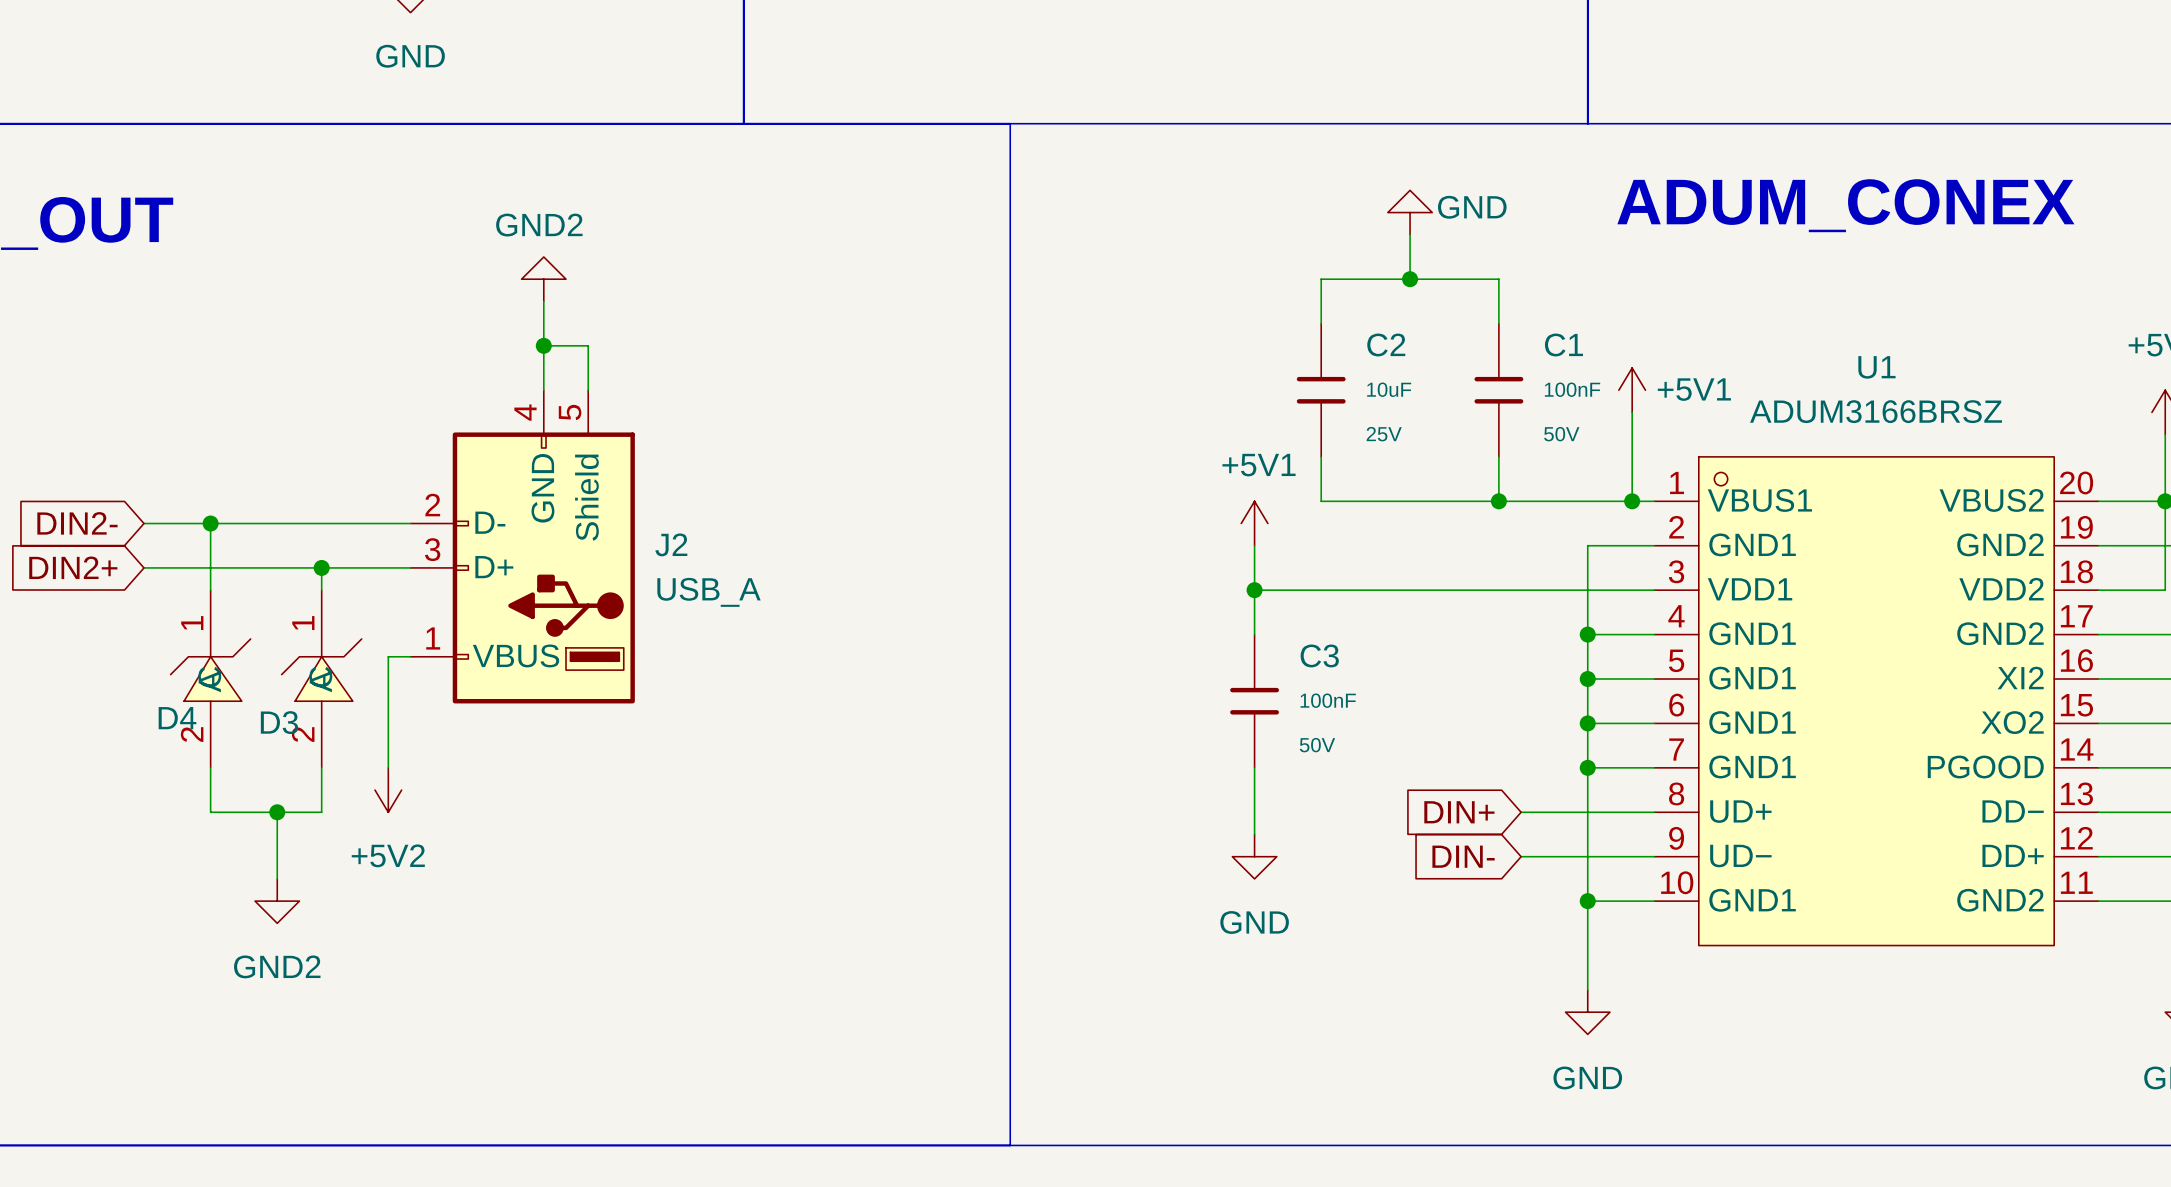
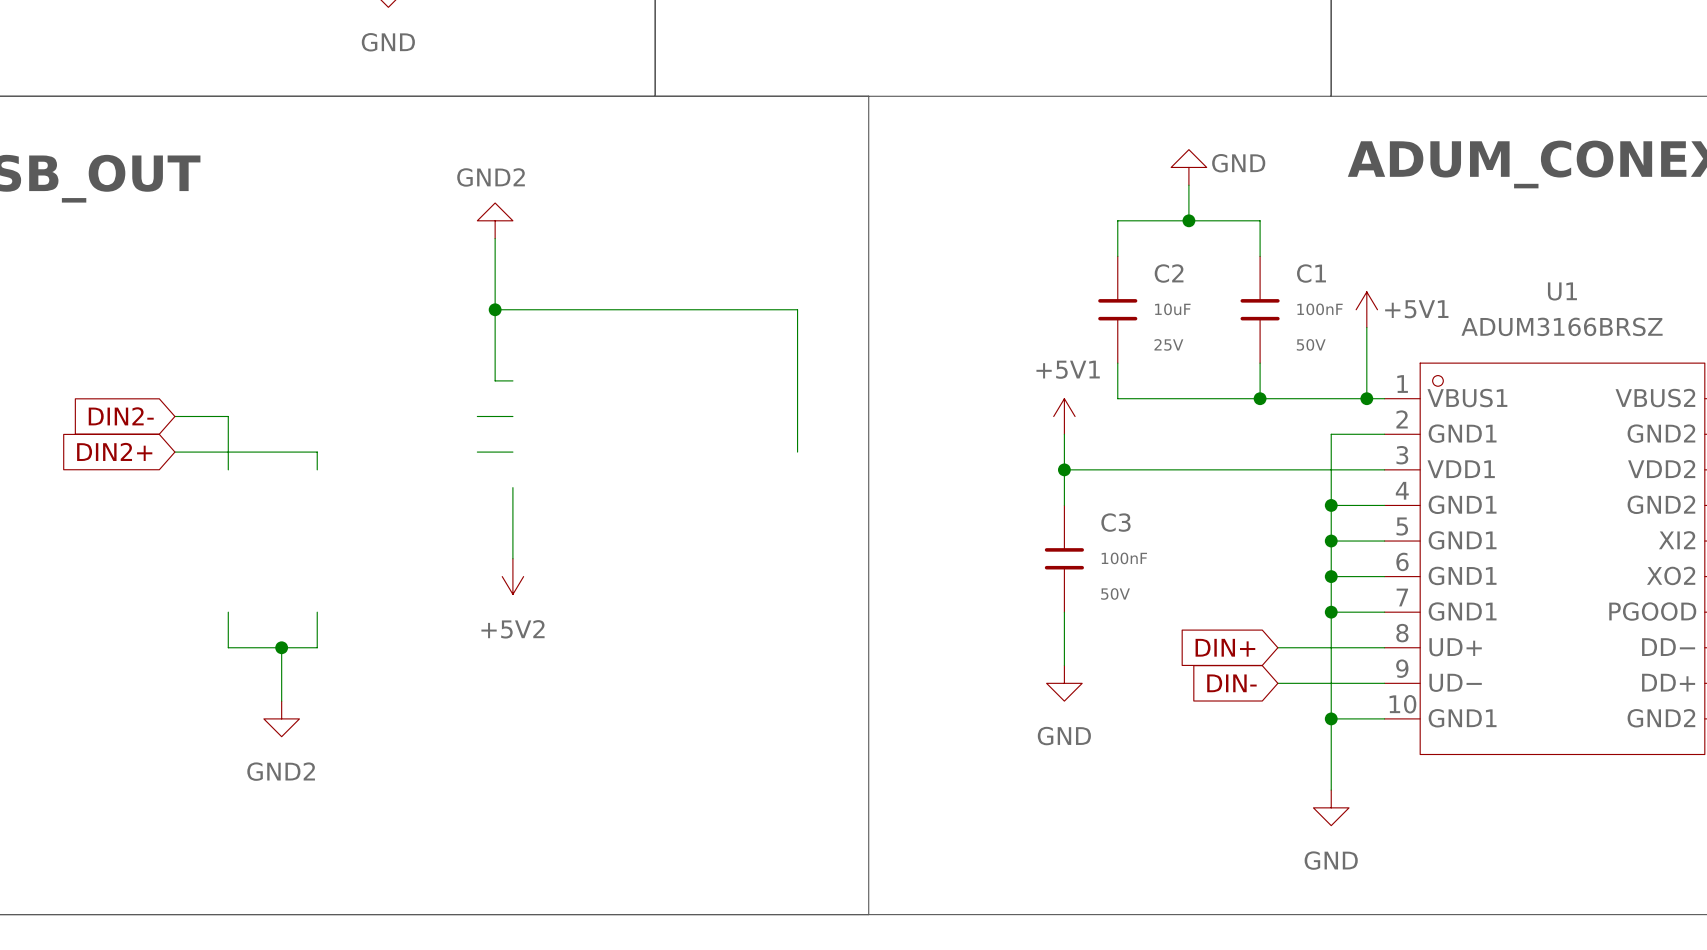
wire: (543, 345) (588, 345) (588, 390) -> none
junction position: (543, 345) -> (495, 309)
wire: none -> (512, 380) (495, 380) (495, 309) (797, 309) (797, 452)
wire: (210, 523) (410, 523) -> none
junction: (210, 523) -> none
J2: USB_A (522, 546) -> none
wire: (321, 567) (410, 567) -> none
junction: (321, 567) -> none
wire: (410, 656) (388, 656) (388, 767) -> none
D4: (210, 679) -> none
D3: (321, 679) -> none
power symbol position: +5V2 (388, 790) -> +5V2 (512, 576)

